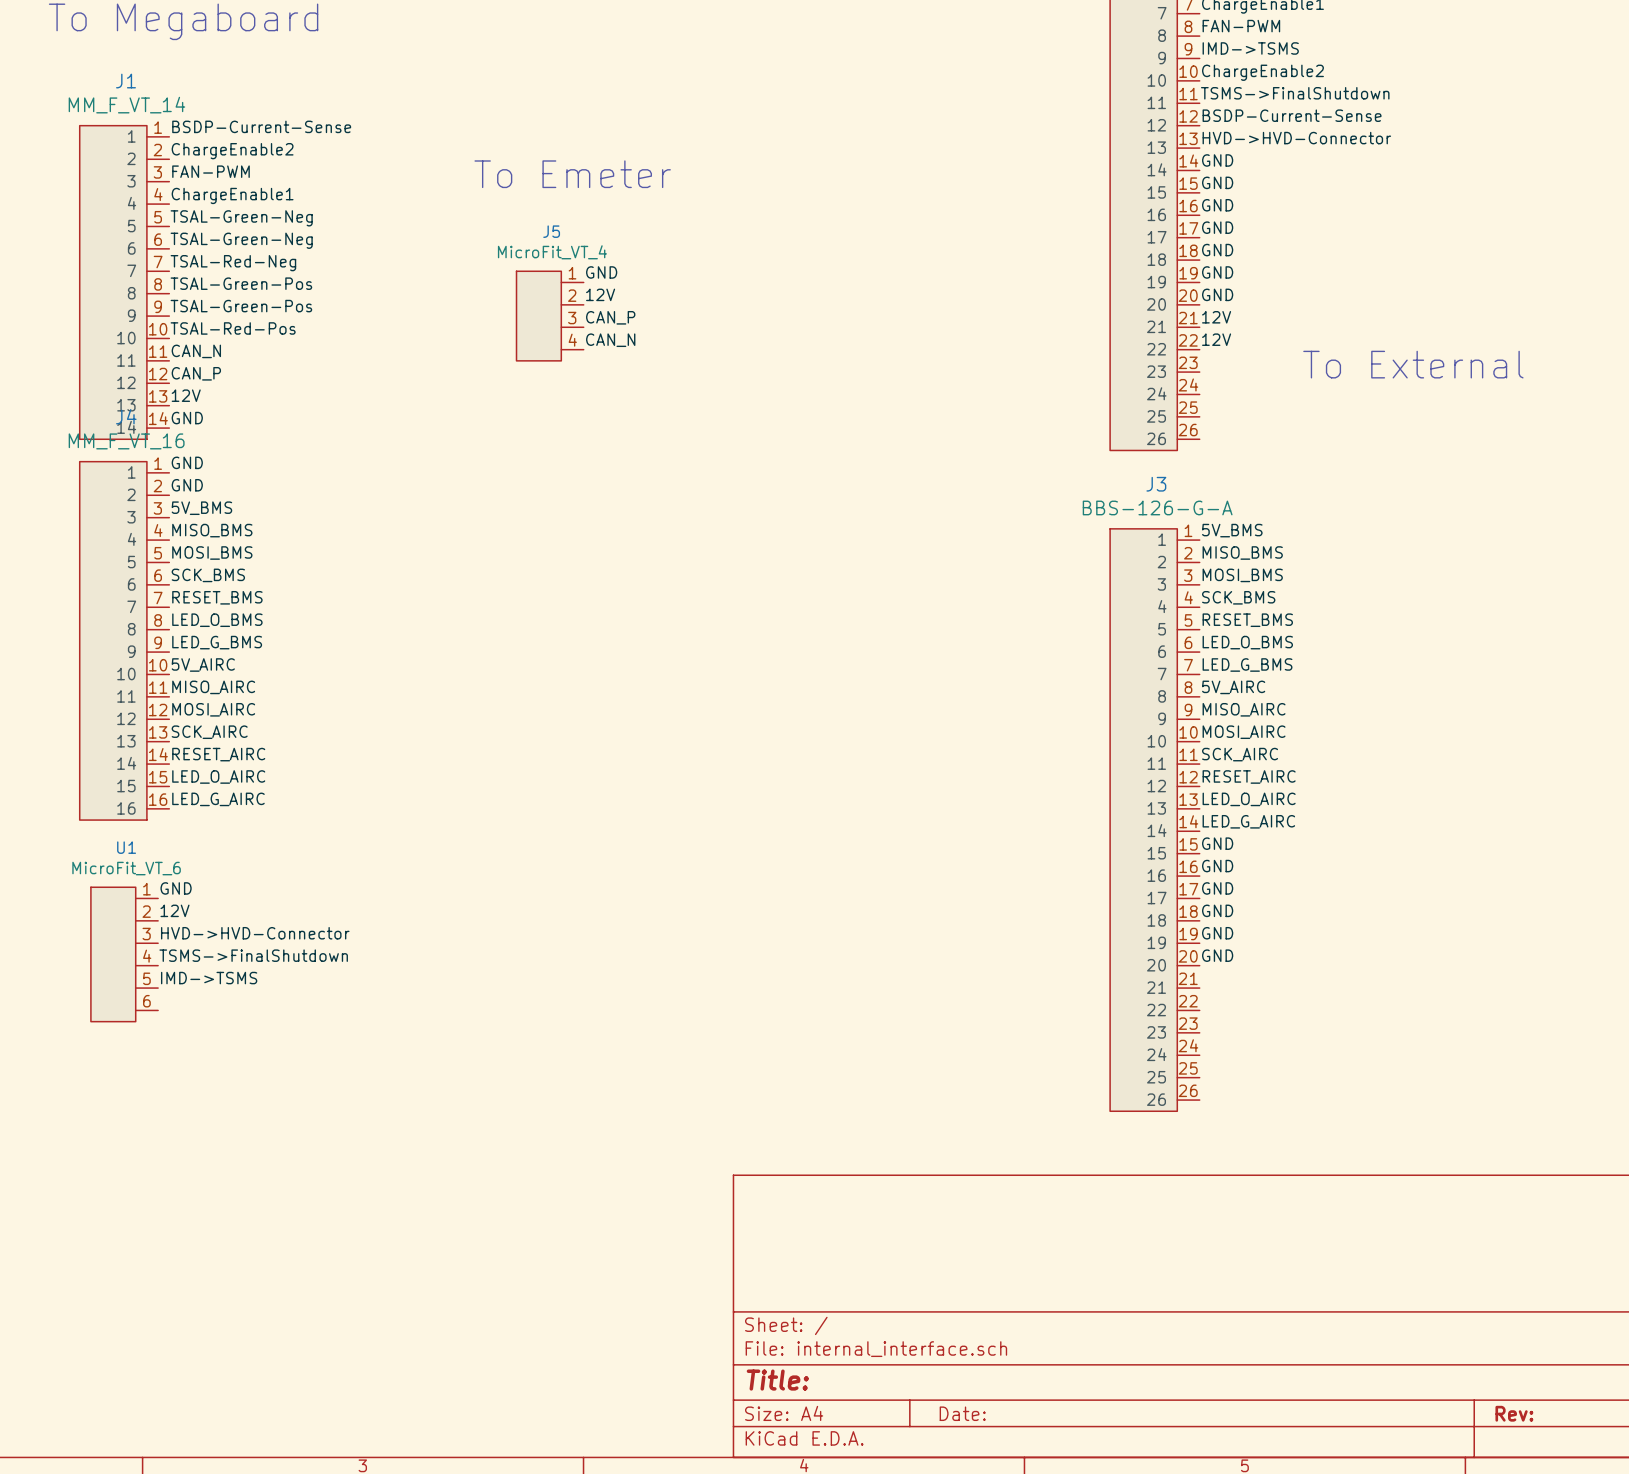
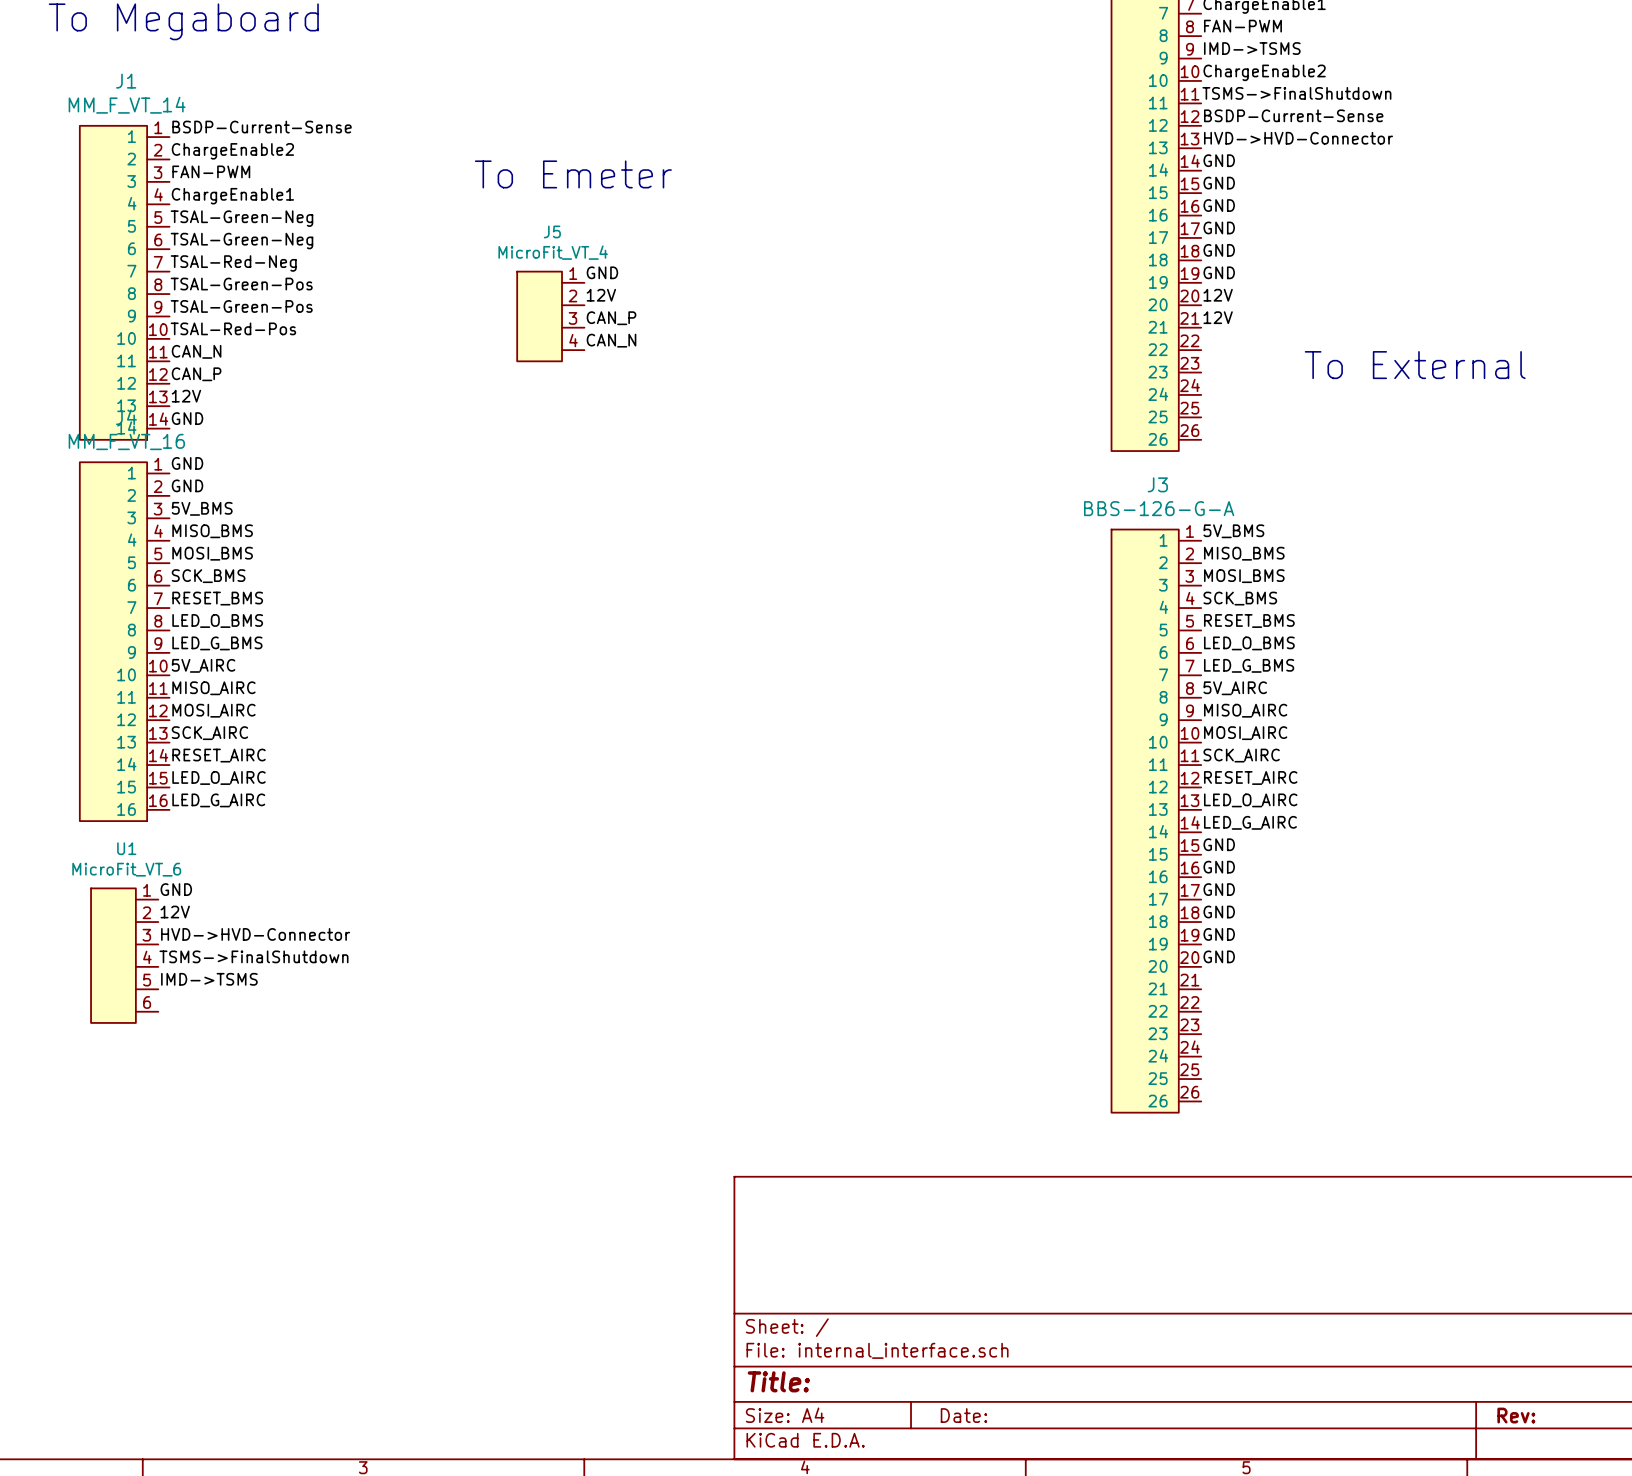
label: GND (1217, 294) -> 12V (1218, 295)
label: 12V (1216, 339) -> none

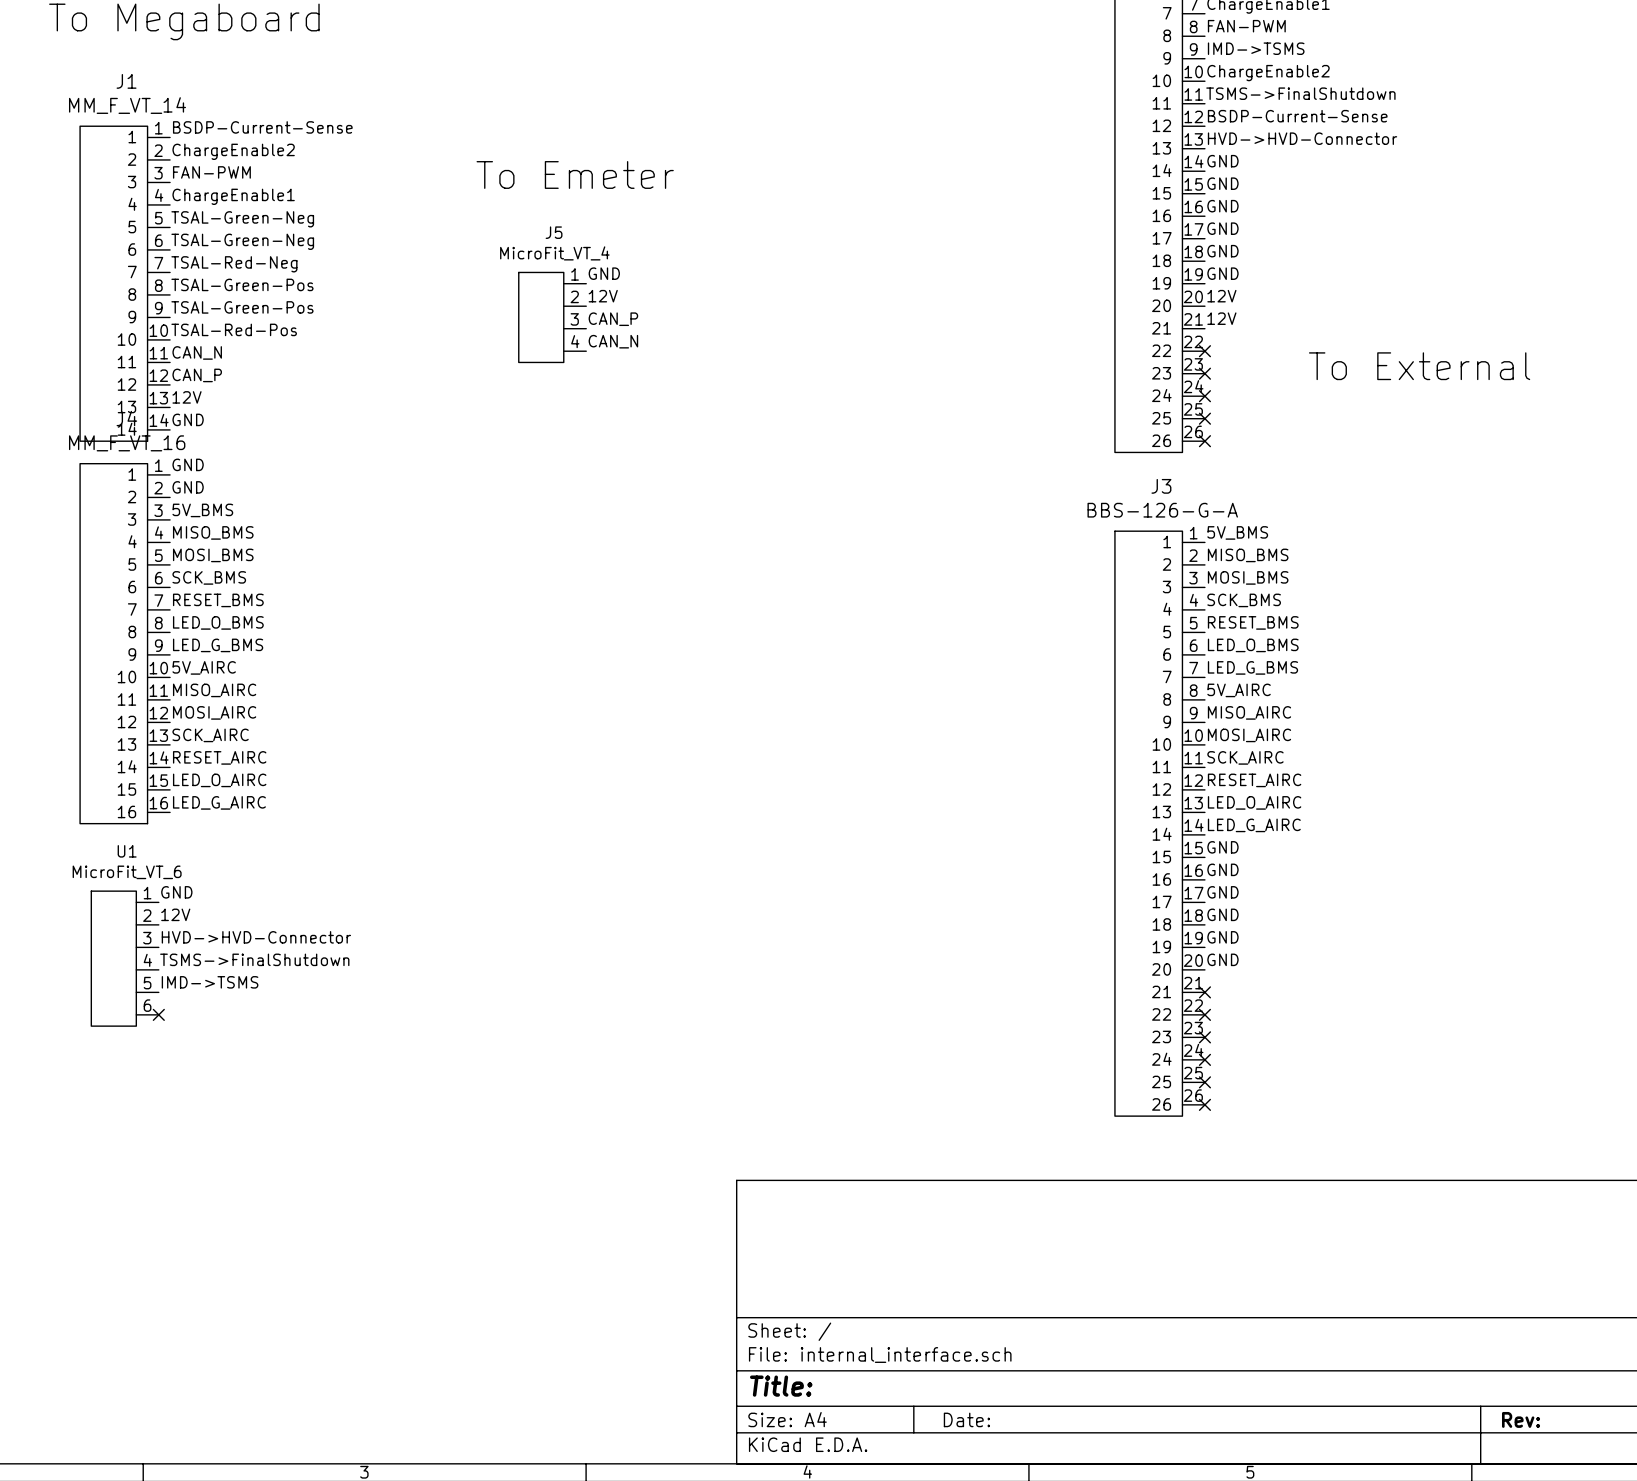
no-connect mark: none -> (1204, 351)
no-connect mark: none -> (1204, 373)
no-connect mark: none -> (1204, 396)
no-connect mark: none -> (1204, 418)
no-connect mark: none -> (1204, 441)
no-connect mark: none -> (1204, 992)
no-connect mark: none -> (158, 1014)
no-connect mark: none -> (1204, 1014)
no-connect mark: none -> (1204, 1037)
no-connect mark: none -> (1204, 1059)
no-connect mark: none -> (1204, 1082)
no-connect mark: none -> (1204, 1104)

